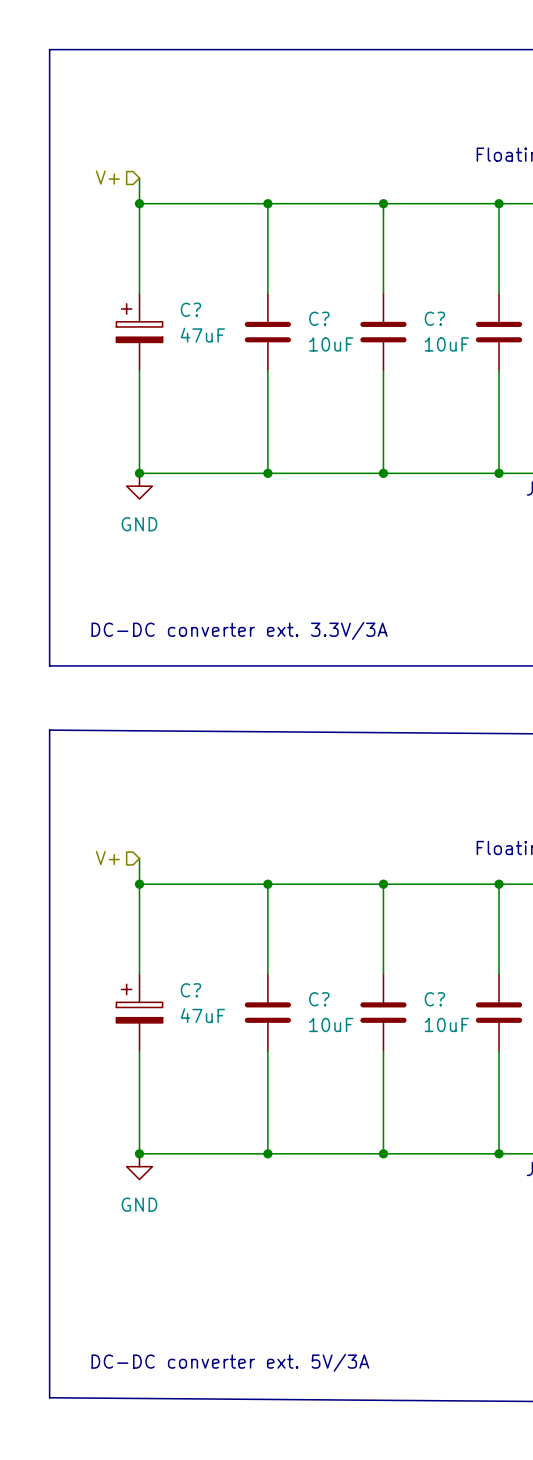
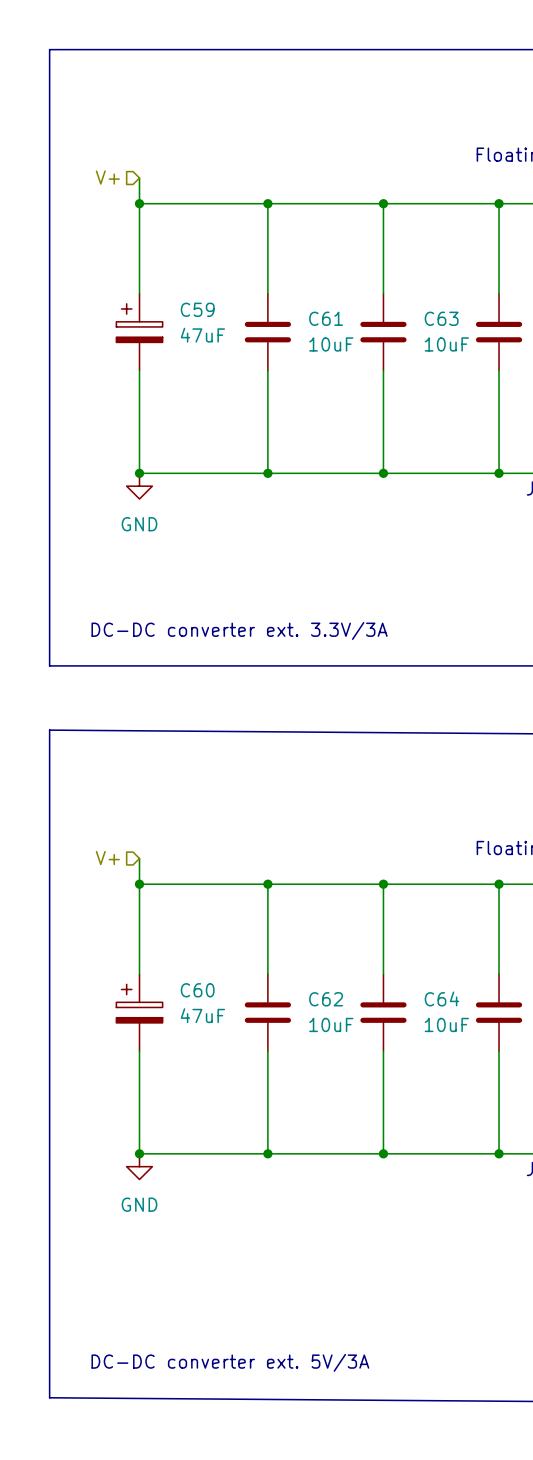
C? name: C? (190, 309) -> C59 (197, 309)
C? name: C? (319, 318) -> C61 (326, 318)
C? name: C? (434, 318) -> C63 (441, 318)
C? name: C? (190, 990) -> C60 (197, 990)
C? name: C? (319, 999) -> C62 (326, 999)
C? name: C? (434, 999) -> C64 (441, 998)

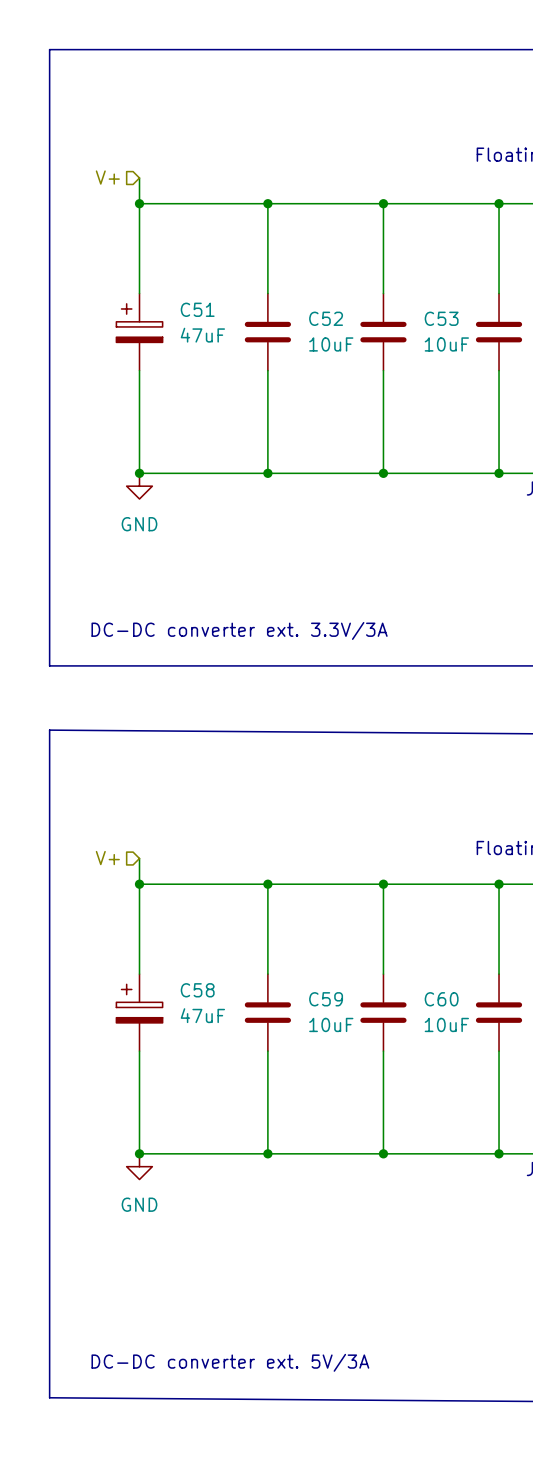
C59 name: C59 (197, 309) -> C51 (197, 309)
C61 name: C61 (326, 318) -> C52 (326, 318)
C63 name: C63 (441, 318) -> C53 (441, 318)
C60 name: C60 (197, 990) -> C58 (197, 990)
C64 name: C64 (441, 998) -> C60 (441, 999)
C62 name: C62 (326, 999) -> C59 (326, 999)

